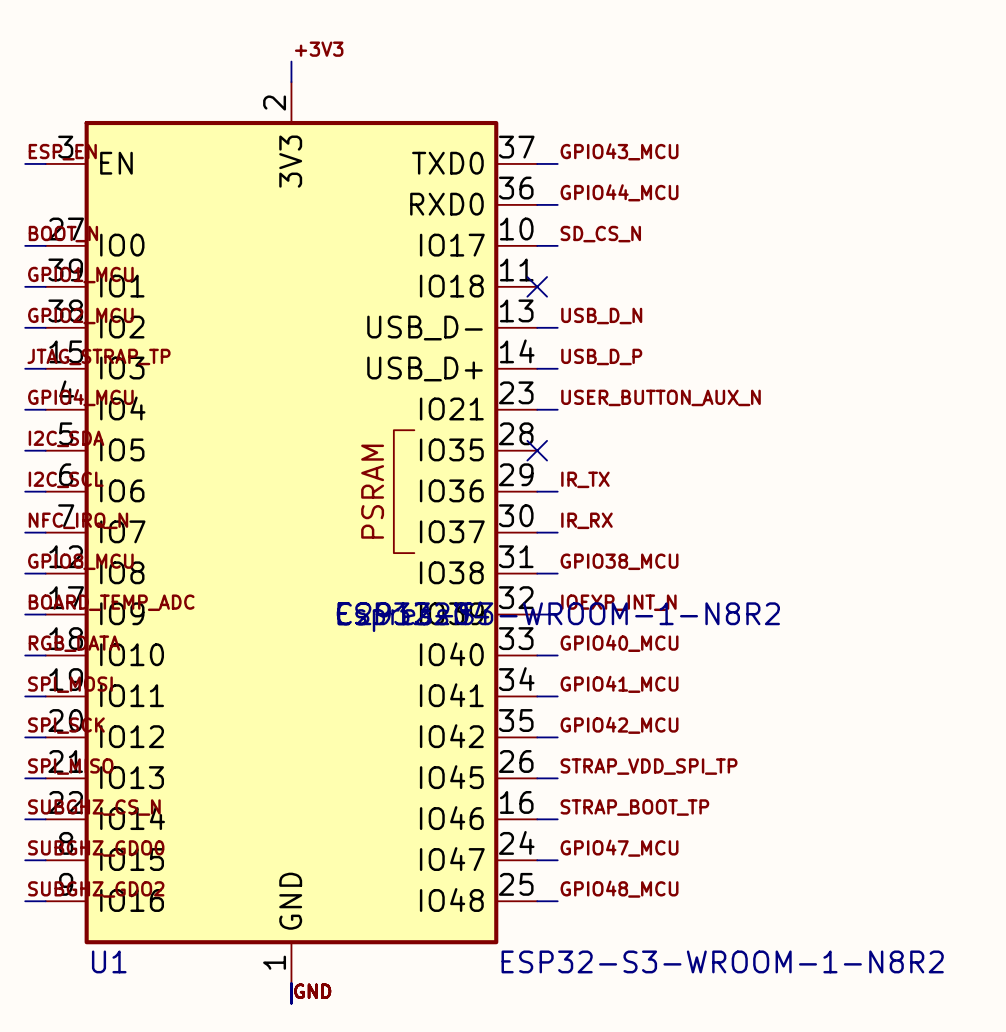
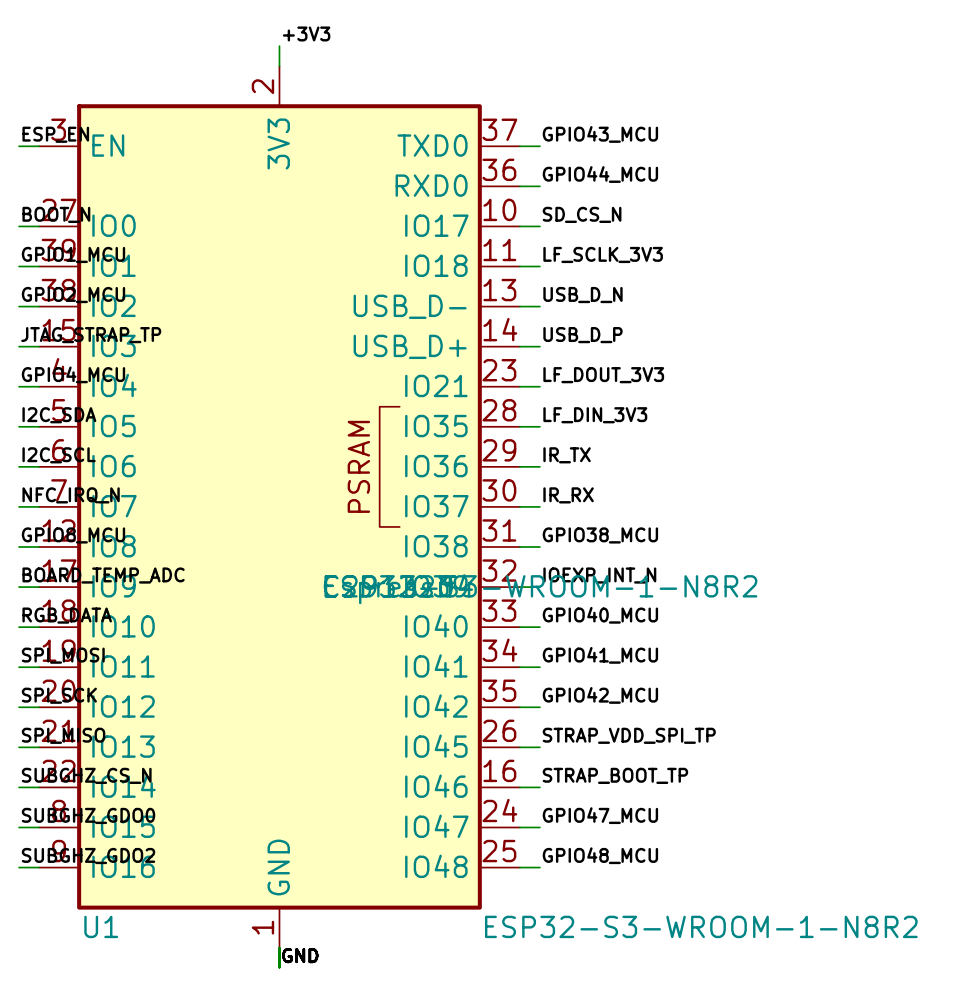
label: none -> LF_SCLK_3V3 (603, 254)
wire: none -> (519, 266) (539, 266)
no-connect mark: (537, 286) -> none
label: USER_BUTTON_AUX_N (660, 397) -> LF_DOUT_3V3 (603, 375)
label: none -> LF_DIN_3V3 (595, 415)
wire: none -> (519, 426) (539, 426)
no-connect mark: (537, 450) -> none

